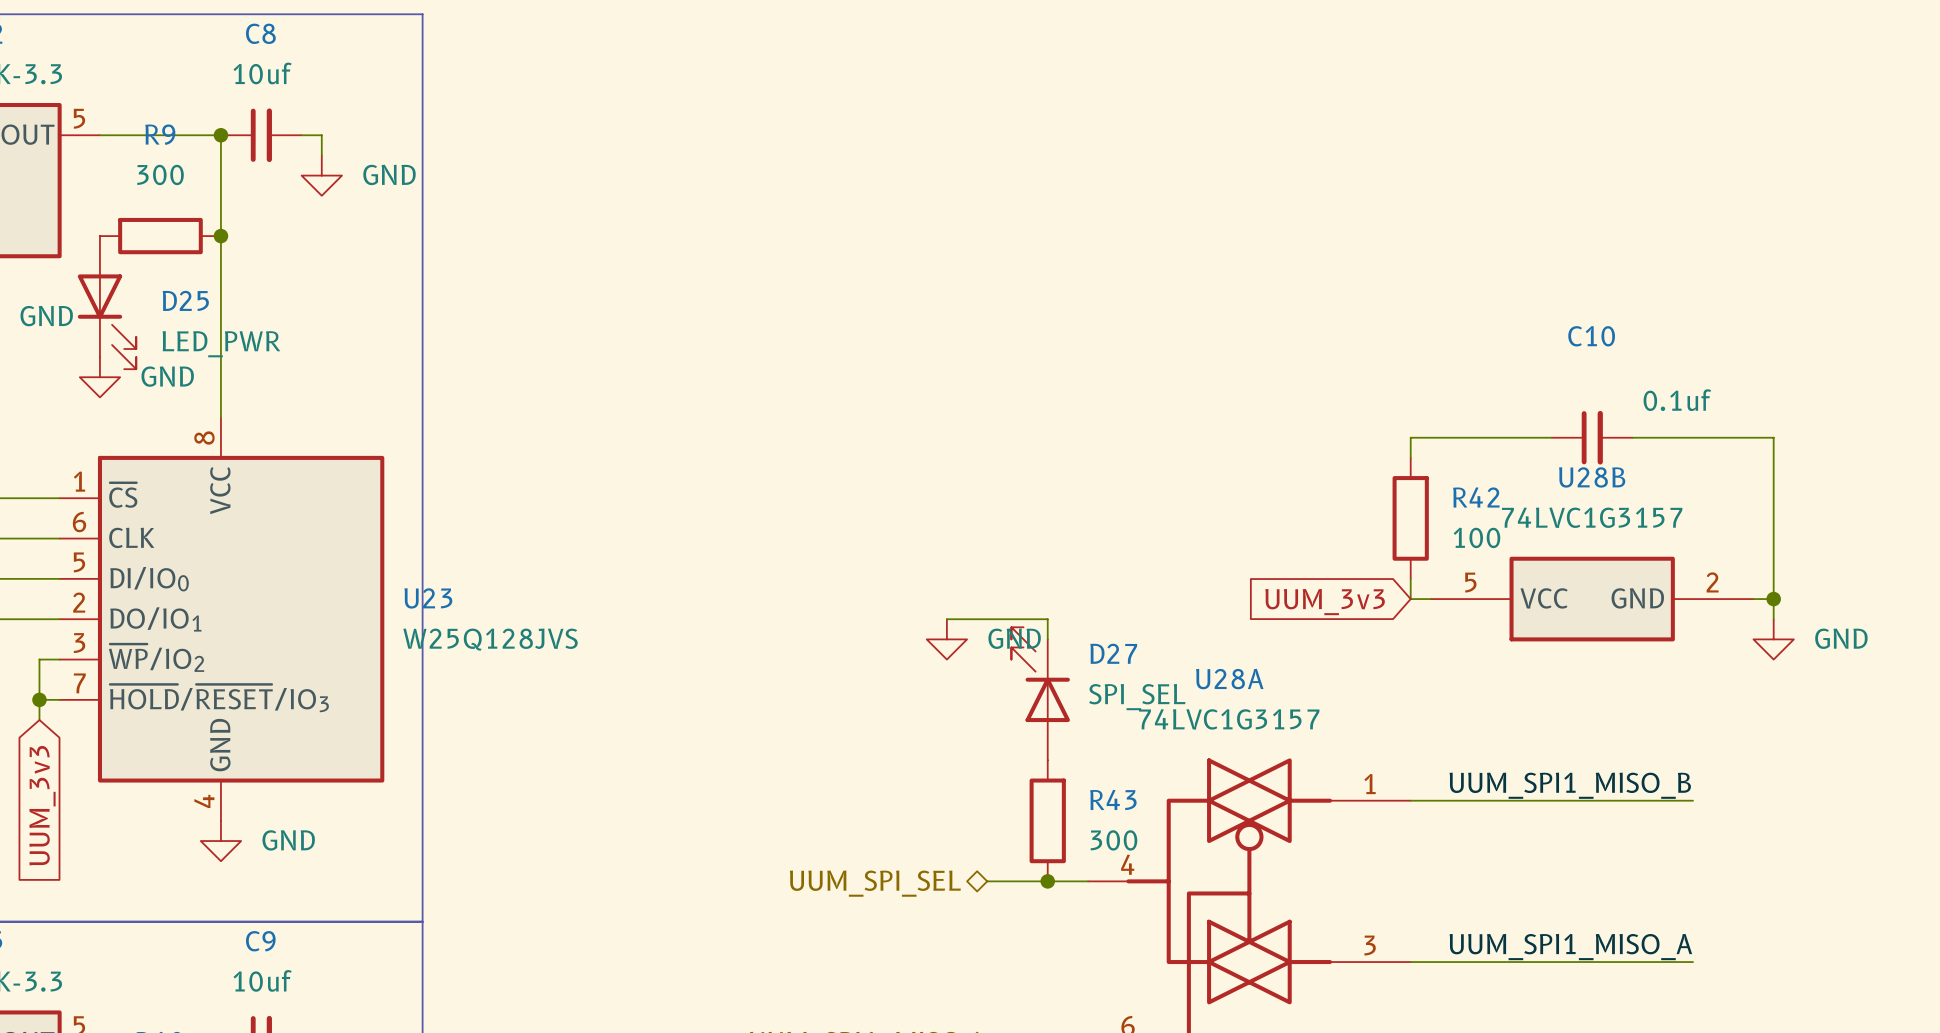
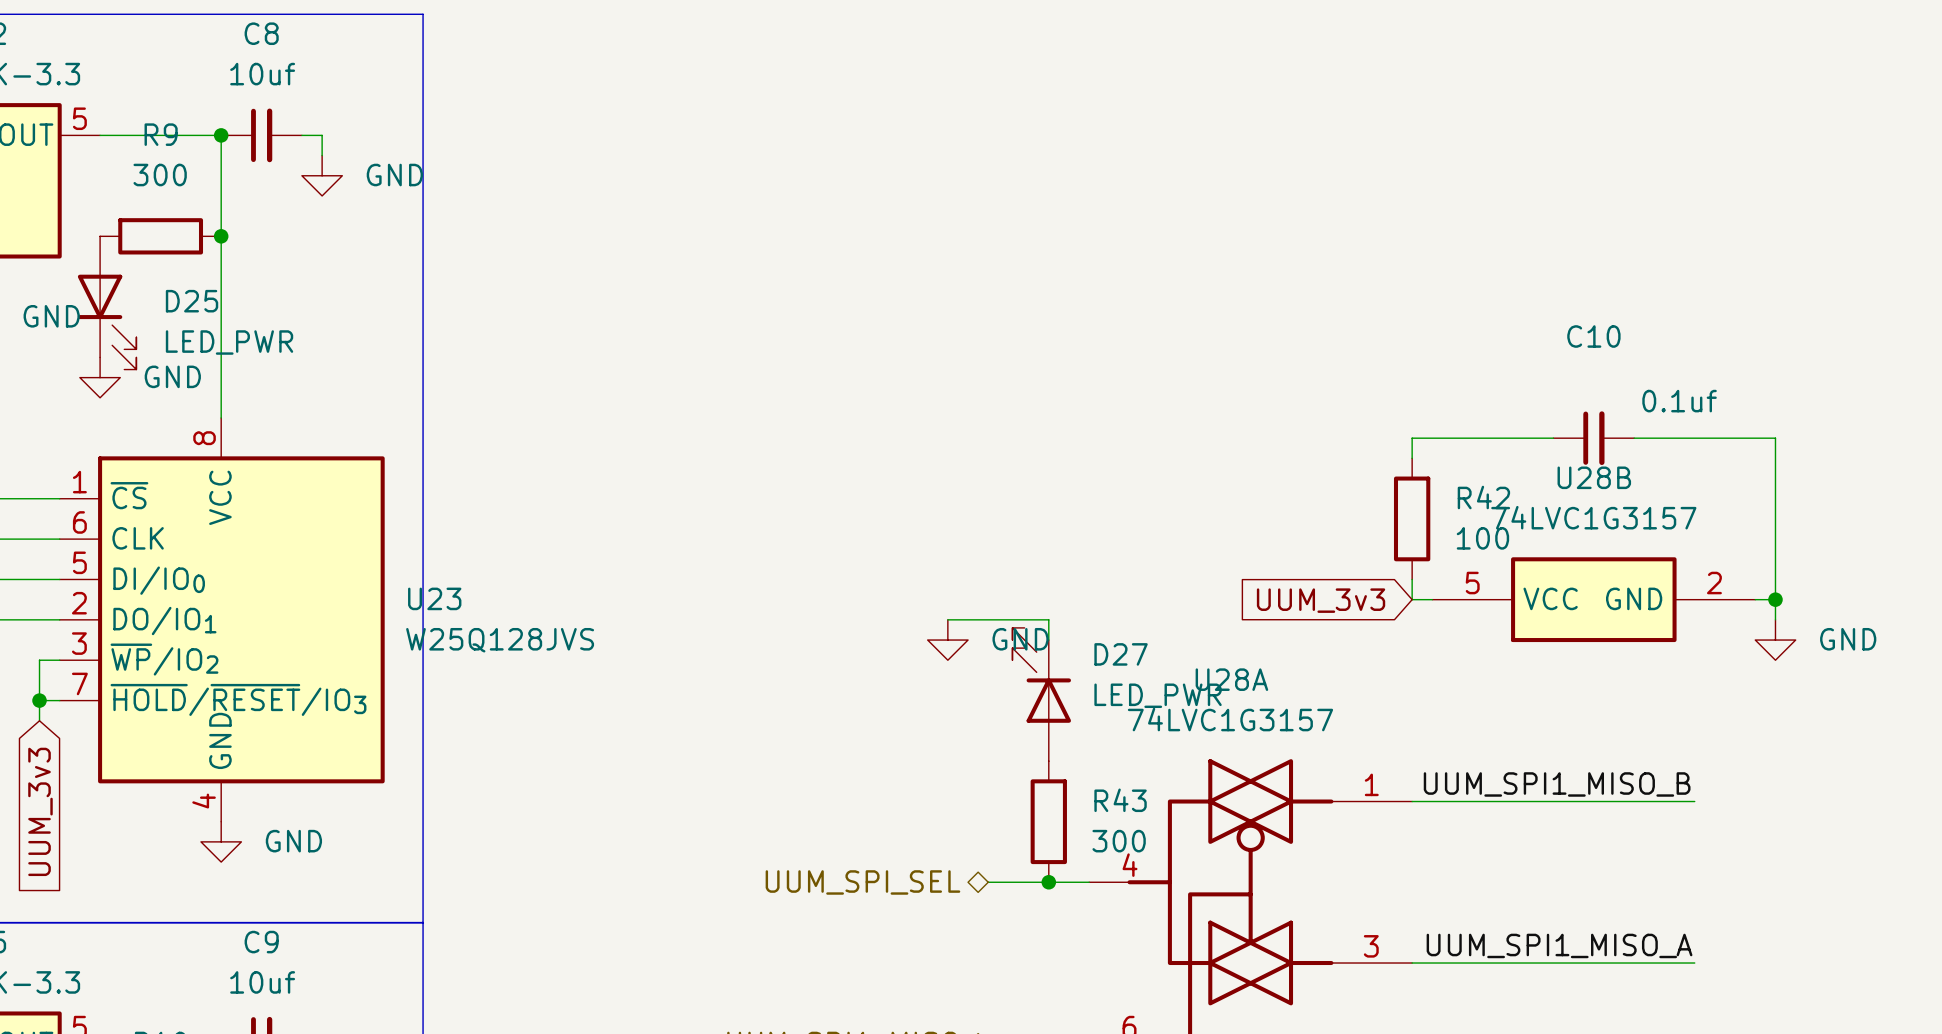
D27 value: SPI_SEL (1137, 697) -> LED_PWR (1158, 695)

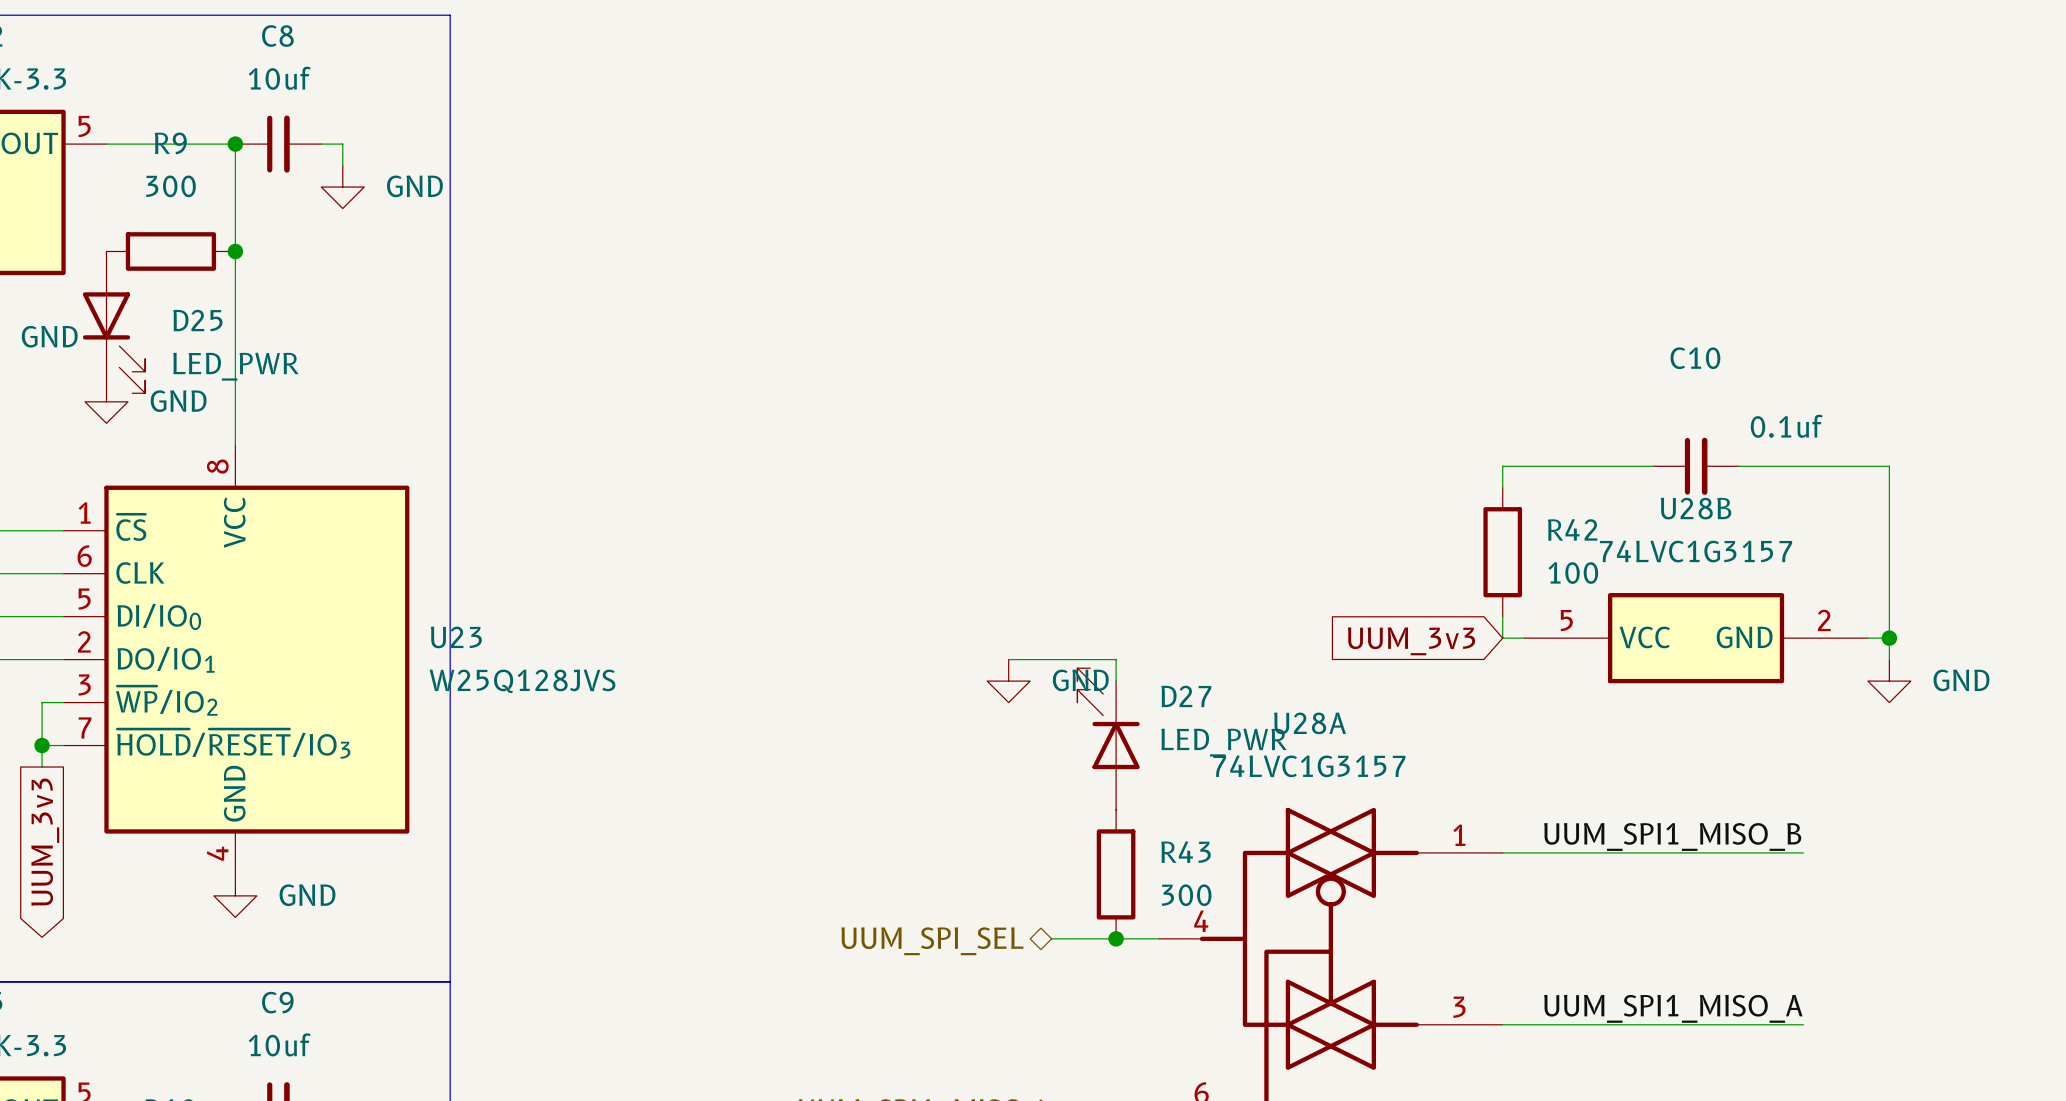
global label shape: input (40, 811) -> output (45, 842)

